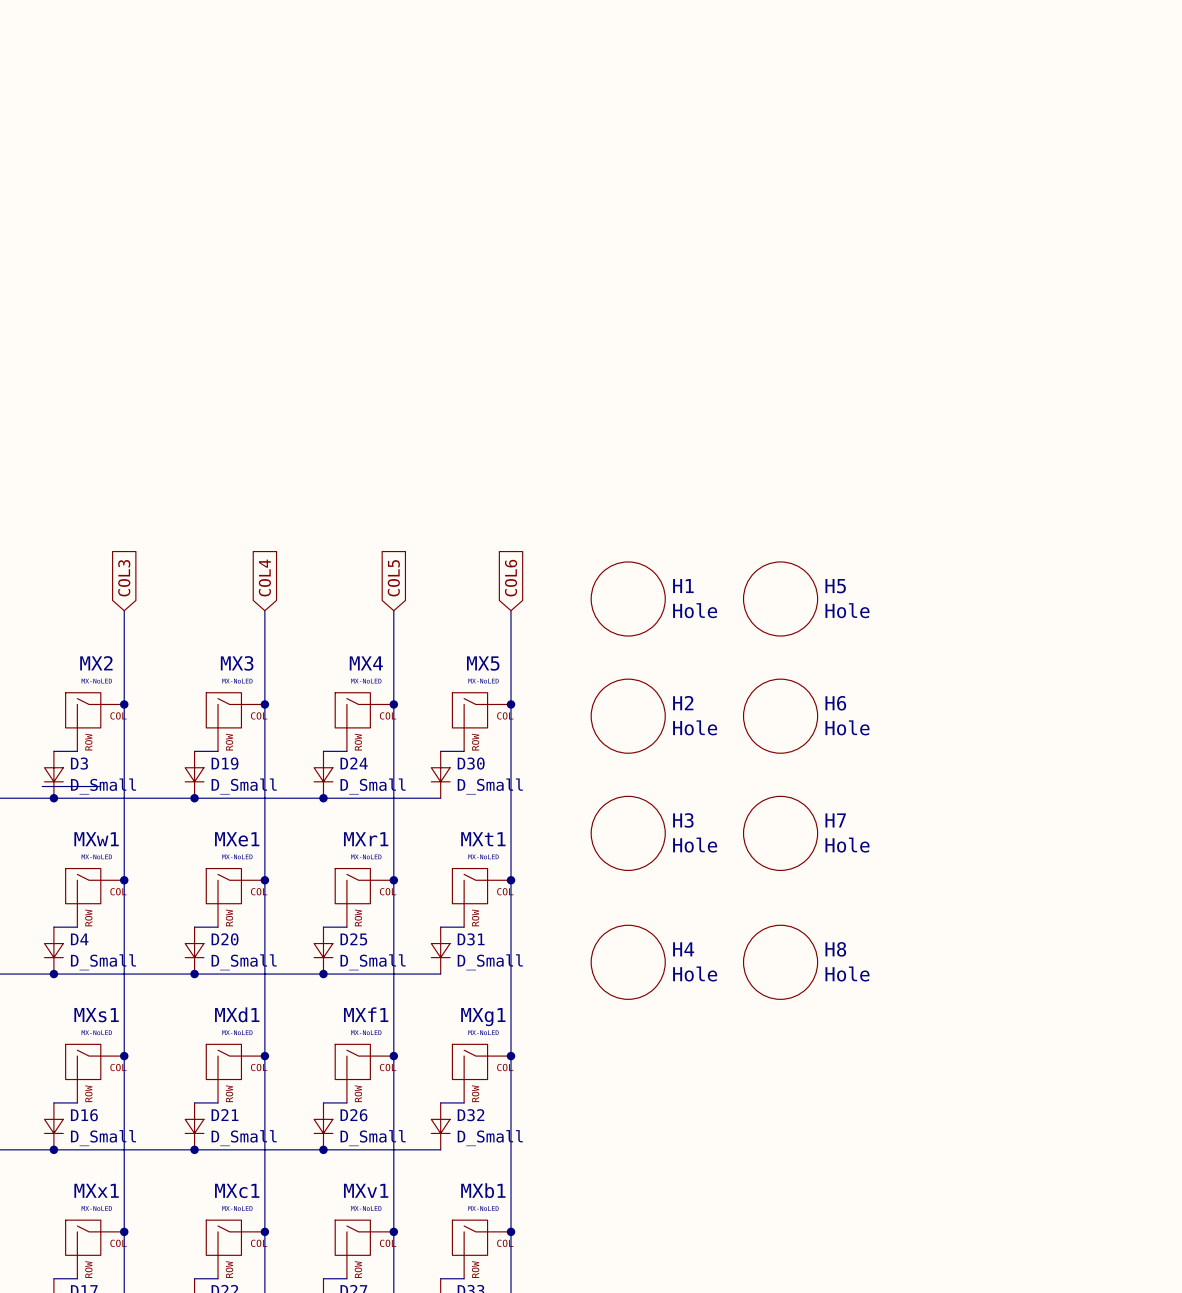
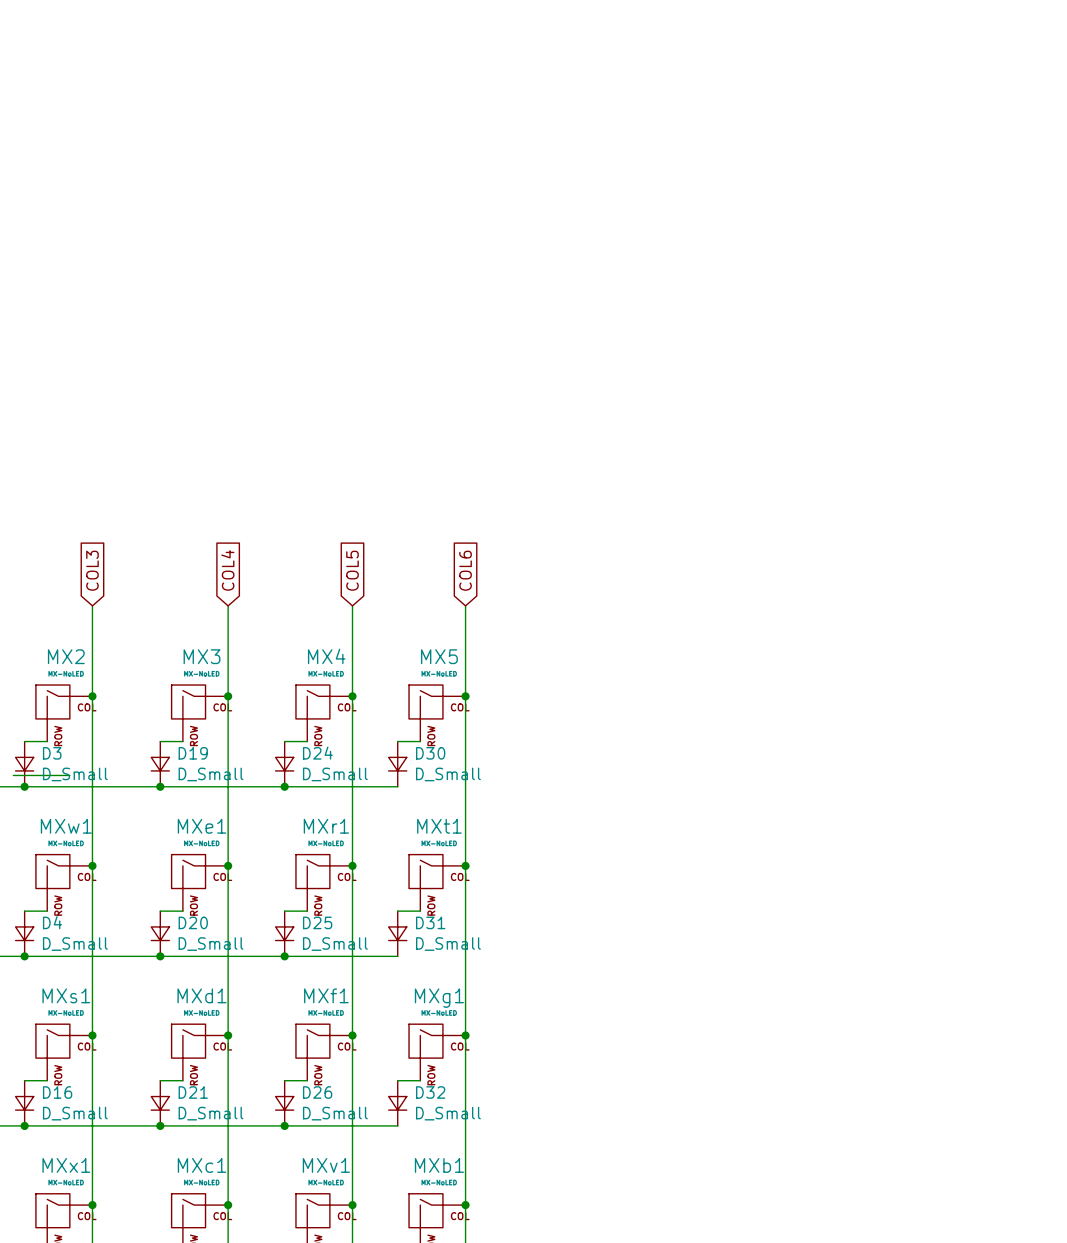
H1: Hole (628, 598) -> none
H5: Hole (780, 598) -> none
H2: Hole (628, 716) -> none
H6: Hole (780, 716) -> none
H3: Hole (628, 833) -> none
H7: Hole (780, 833) -> none
H4: Hole (628, 962) -> none
H8: Hole (780, 962) -> none

